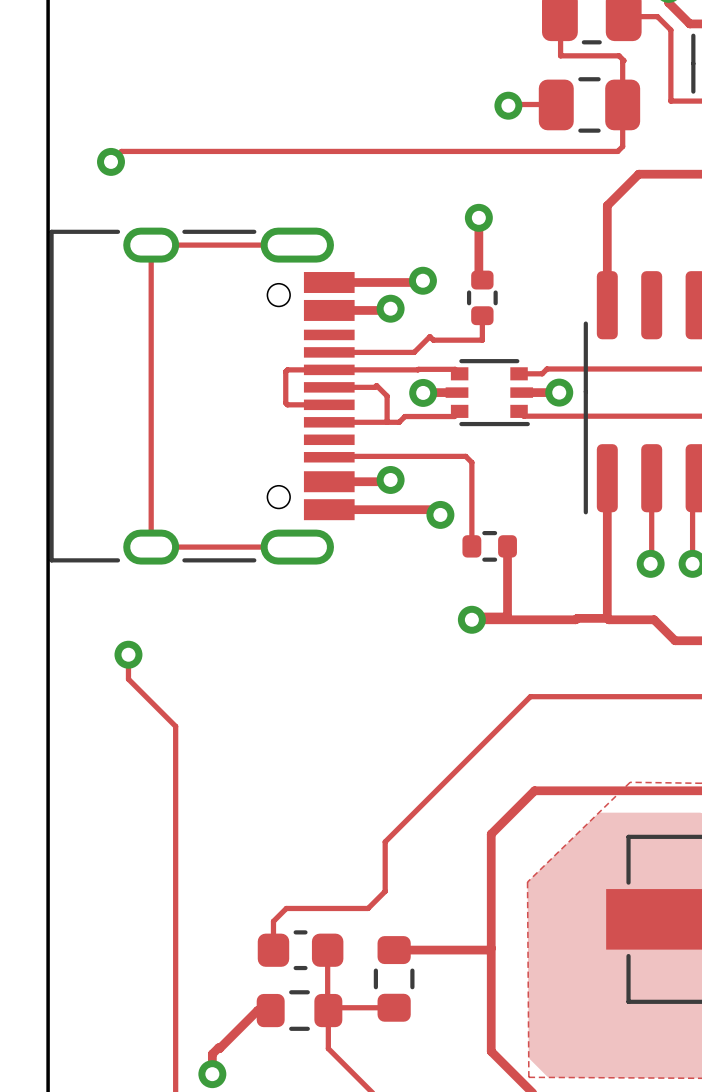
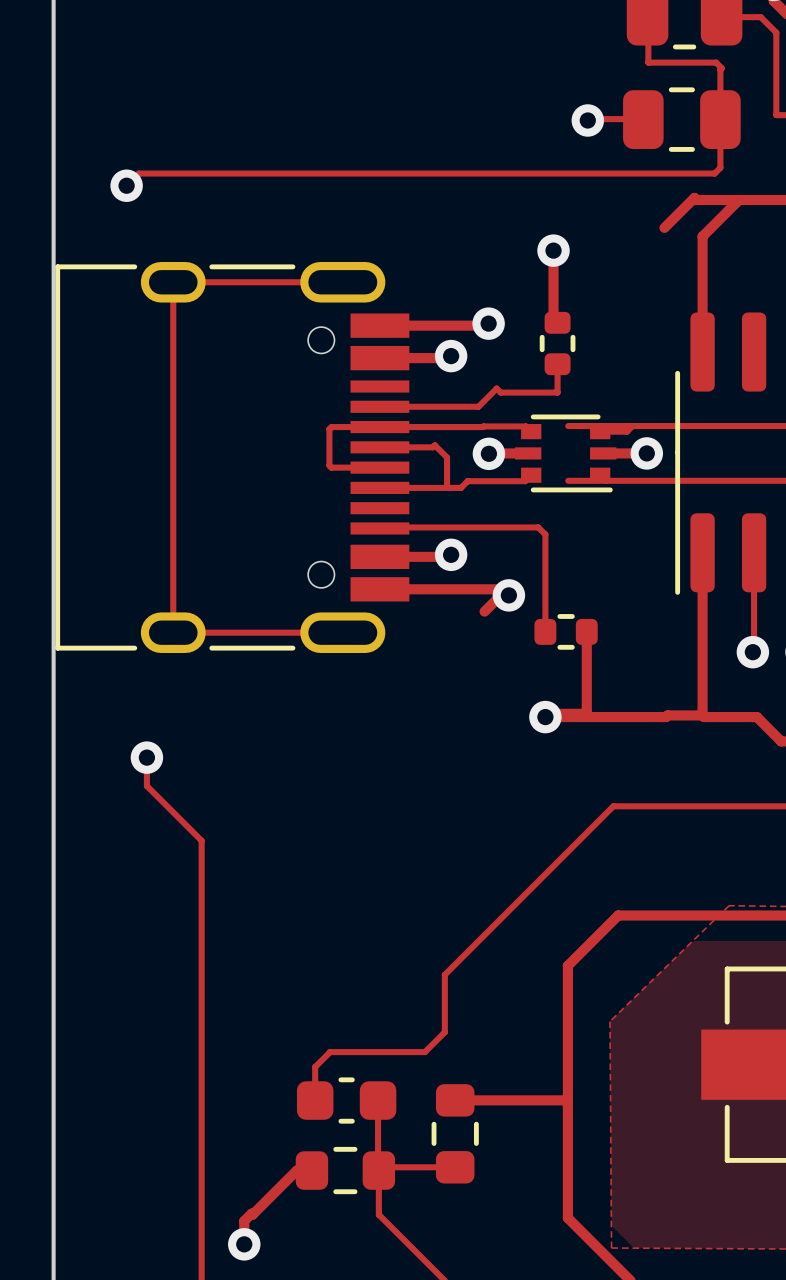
track: none -> (739, 200) (696, 200) (694, 197) (664, 227)
track: none -> (568, 426) (632, 426)
track: none -> (568, 480) (605, 480)
track: none -> (500, 595) (484, 611)

